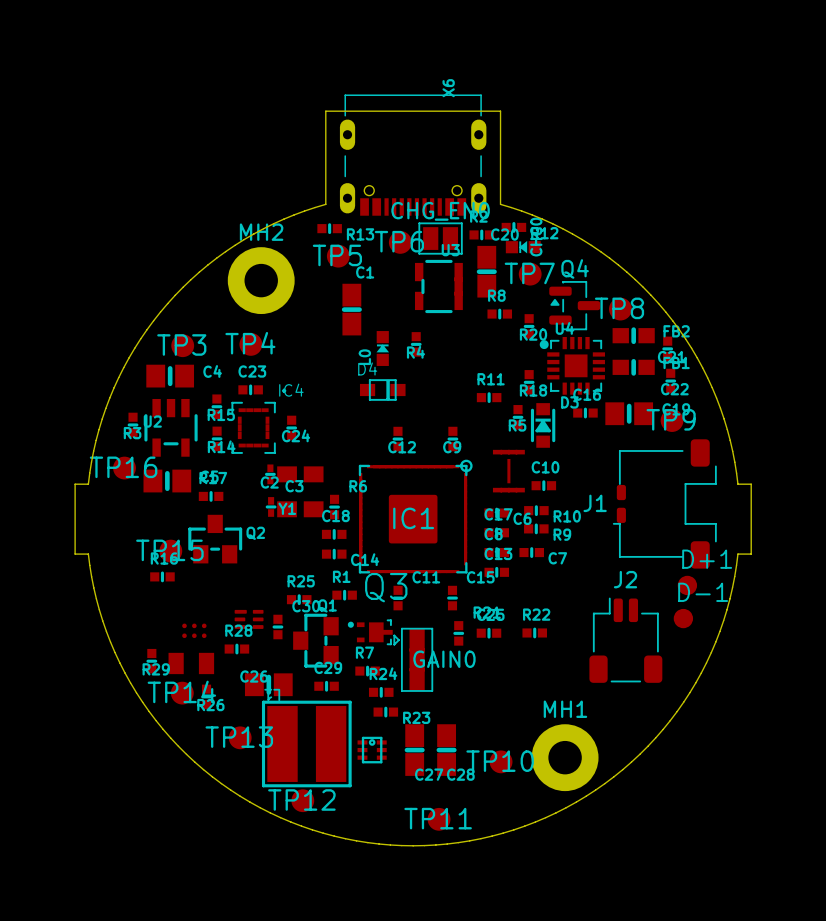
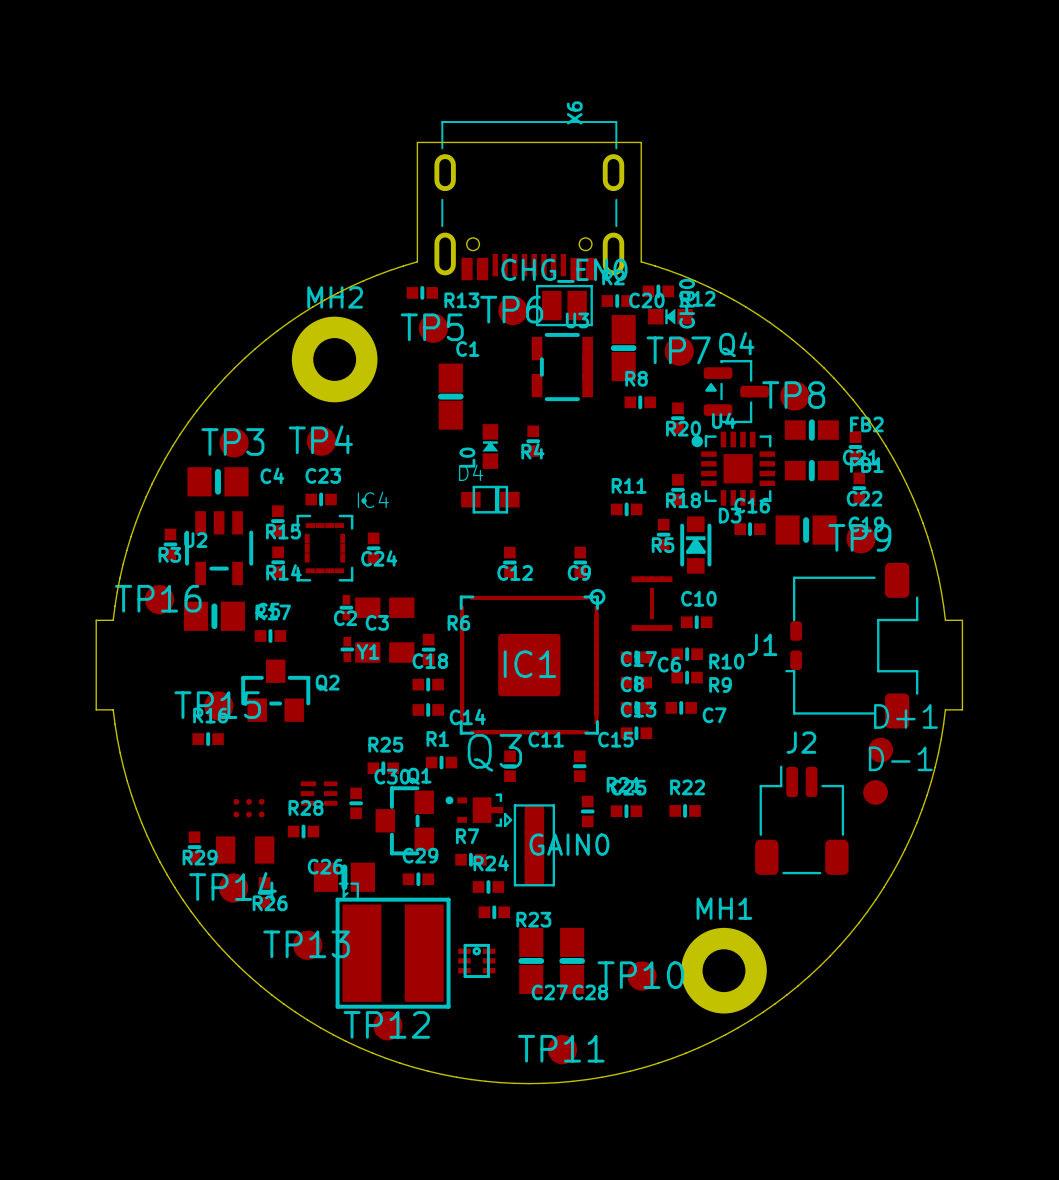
X6 footprint: [339, 94, 487, 216] -> [434, 121, 625, 281]

